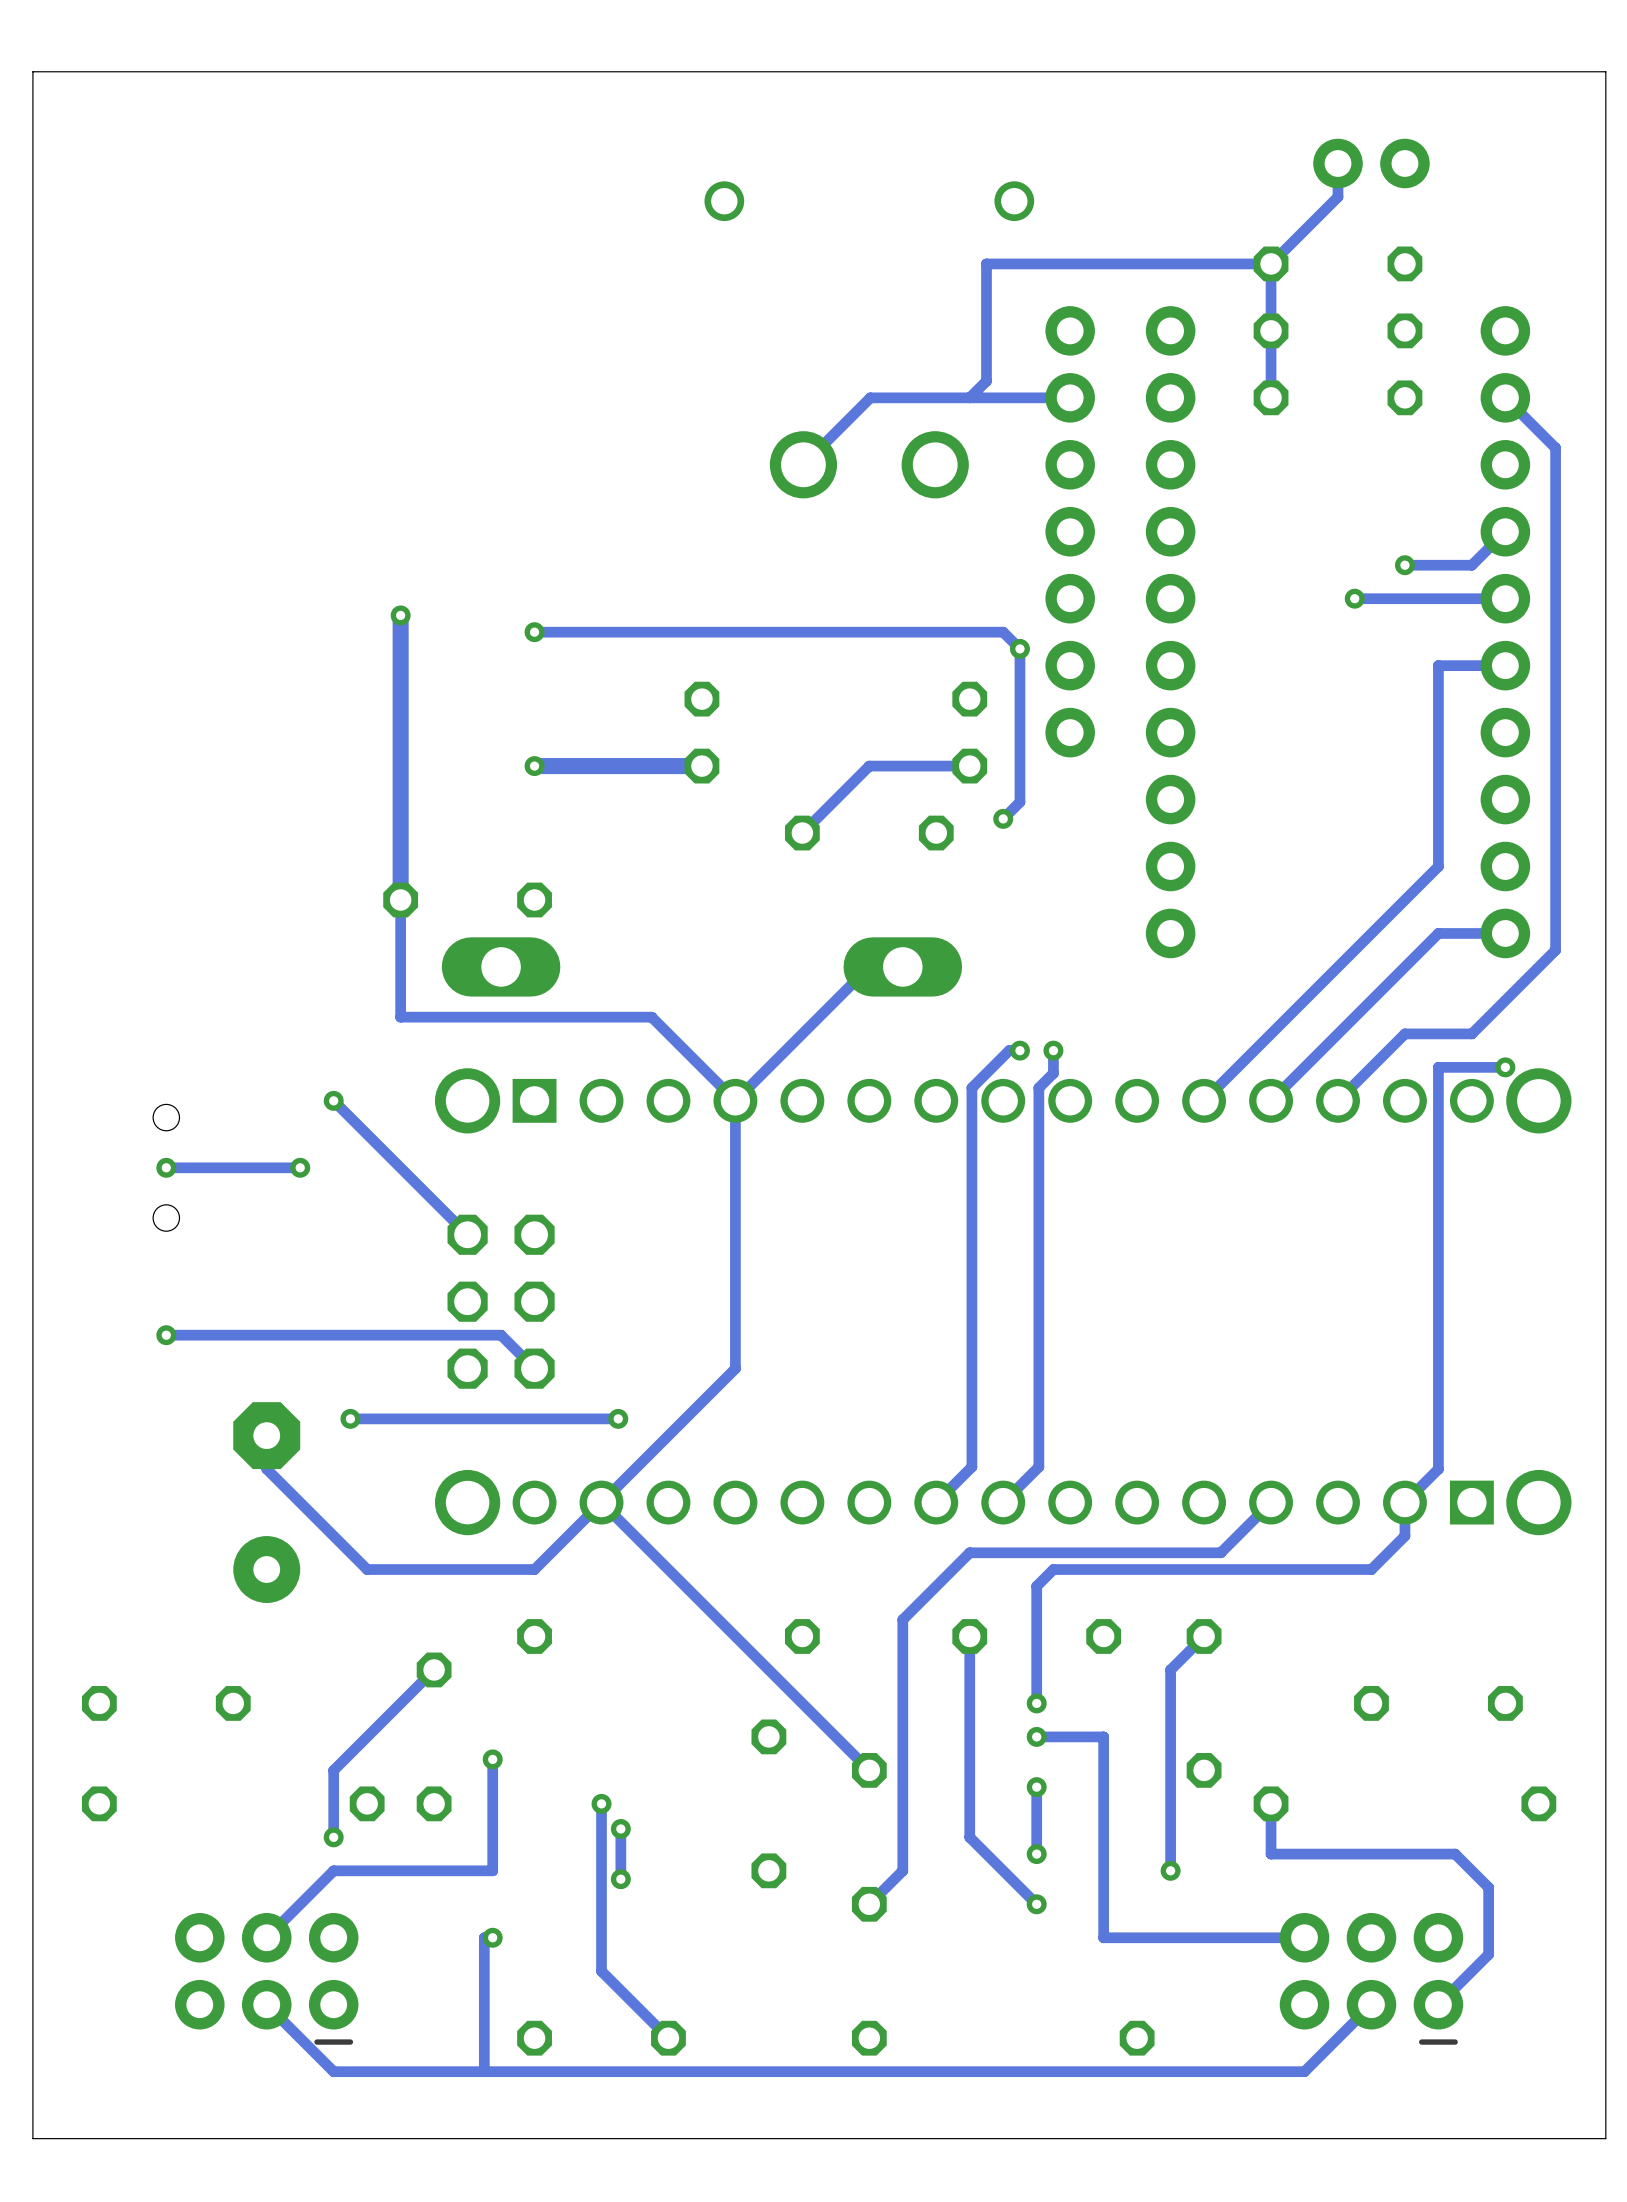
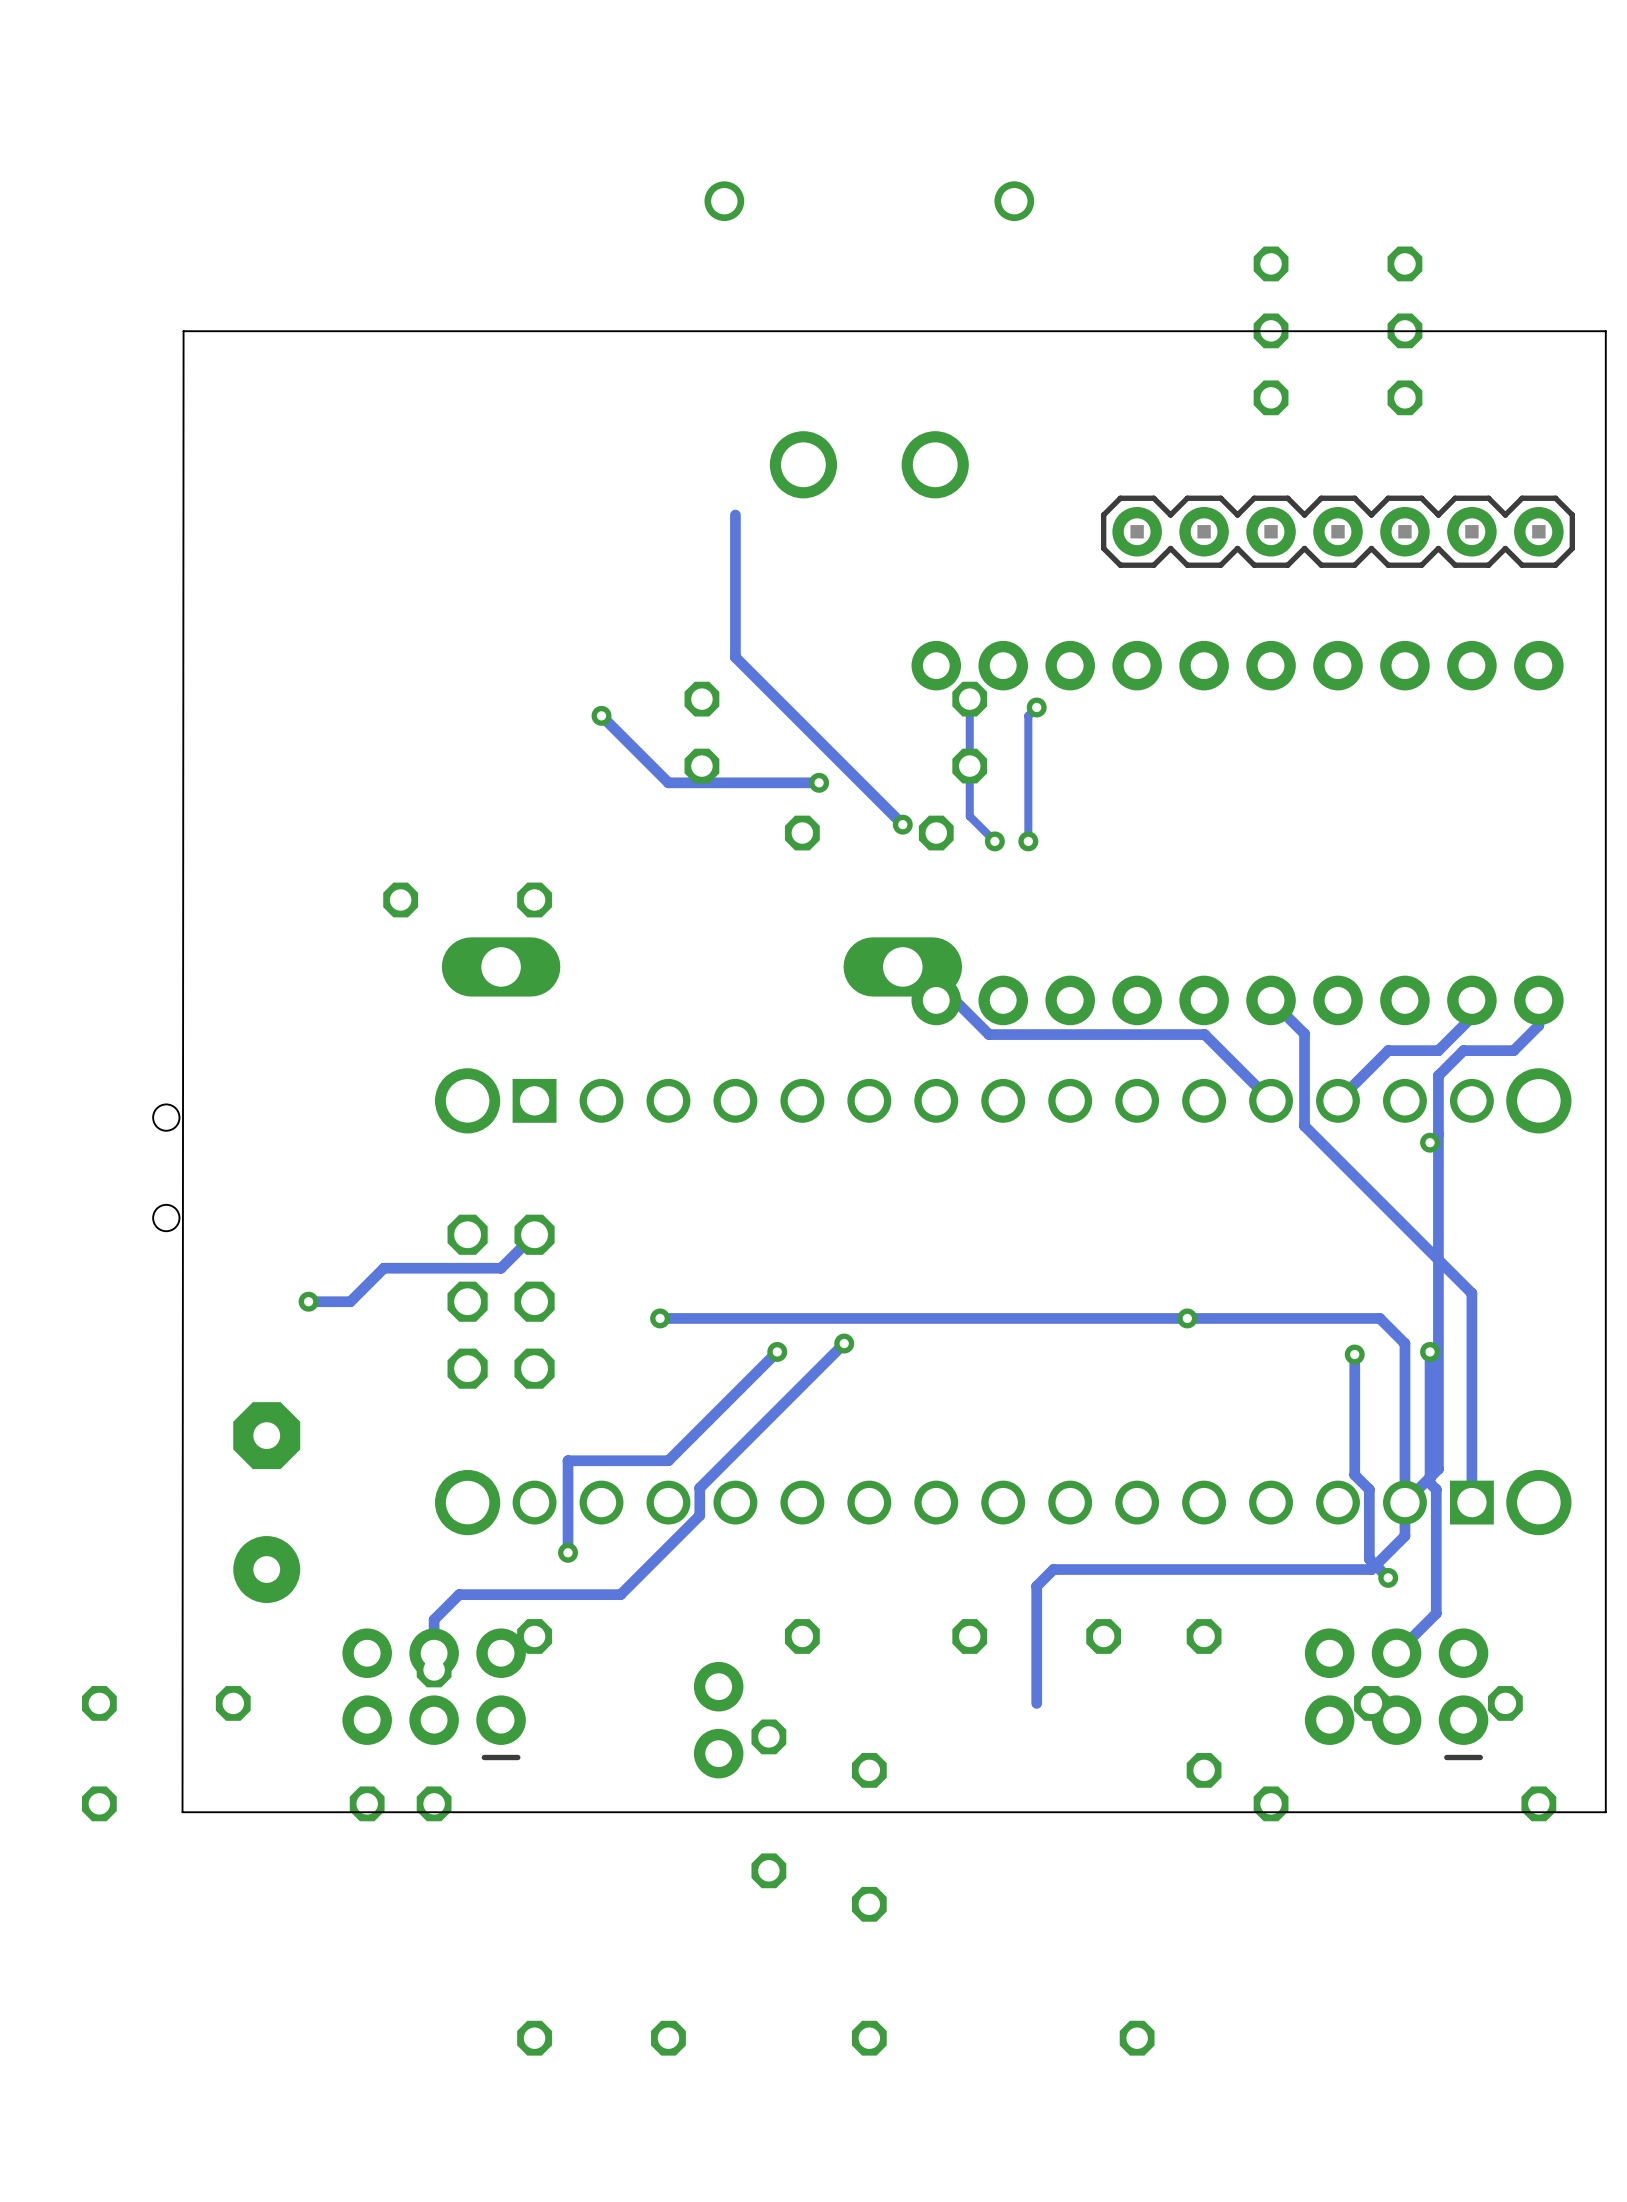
track: (1338, 163) (1338, 196) (1271, 263) -> none
part: (1371, 163) -> none
track: (1271, 263) (1271, 397) -> none
track: (1271, 263) (986, 263) (986, 381) (969, 397) -> none
board edge: (1605, 331) (1605, 71) (32, 71) (32, 2138) (1605, 2138) (1605, 1812) -> (1605, 331) (183, 331) (182, 1812) (1605, 1812)
track: (1070, 397) (870, 397) (803, 464) -> none
track: (1505, 397) (1555, 448) (1555, 950) (1471, 1033) (1404, 1033) (1388, 1050) -> (1471, 1000) (1471, 1017) (1438, 1050) (1388, 1050)
track: none -> (735, 515) (735, 657) (902, 824)
part side: top (1070, 531) -> bottom (1338, 531)
track: (1505, 531) (1471, 565) (1404, 565) -> none
via: (1404, 565) -> none
via: (1354, 598) -> none
track: (1505, 598) (1354, 598) -> none
track: (400, 615) (400, 1017) (651, 1017) (735, 1100) -> none
via: (400, 615) -> none
track: (534, 632) (1003, 632) (1019, 648) (1019, 802) (1003, 818) -> none
via: (534, 632) -> none
part rotation: 0° (1170, 632) -> 90° clockwise (1237, 665)
part: (1505, 632) -> none
via: (1019, 648) -> none
track: (1505, 665) (1438, 665) (1438, 866) (1204, 1100) -> none
track: none -> (969, 707) (969, 816) (994, 841)
track: none -> (1036, 707) (1028, 715) (1028, 841)
via: none -> (1036, 707)
track: none -> (601, 715) (668, 782) (819, 782)
via: none -> (601, 715)
via: (534, 766) -> none
track: (701, 766) (534, 766) -> none
track: (969, 766) (869, 766) (802, 833) -> none
via: none -> (819, 782)
via: (1003, 818) -> none
via: none -> (902, 824)
via: none -> (994, 841)
via: none -> (1028, 841)
track: (1505, 933) (1438, 933) (1271, 1100) -> (936, 1000) (954, 1000) (989, 1034) (1204, 1034) (1271, 1100)
track: (902, 966) (869, 966) (735, 1100) -> none
part: none -> (1237, 1000)
track: none -> (1271, 1000) (1304, 1033) (1304, 1125) (1471, 1293) (1471, 1502)
track: (1019, 1050) (1009, 1050) (971, 1087) (971, 1466) (936, 1502) -> none
via: (1019, 1050) -> none
track: (1053, 1050) (1053, 1073) (1038, 1087) (1038, 1466) (1003, 1502) -> none
via: (1053, 1050) -> none
track: (1505, 1067) (1438, 1067) (1438, 1075) -> (1538, 1000) (1538, 1025) (1513, 1050) (1463, 1050) (1438, 1075)
via position: (1505, 1067) -> (1430, 1142)
track: (333, 1100) (467, 1234) -> none
via: (333, 1100) -> none
track: (735, 1100) (735, 1368) (534, 1569) (367, 1569) (266, 1469) (266, 1435) -> none
via: (166, 1167) -> none
track: (300, 1167) (166, 1167) -> none
via: (300, 1167) -> none
track: none -> (534, 1234) (501, 1268) (383, 1268) (350, 1301) (308, 1301)
via: none -> (308, 1301)
track: none -> (660, 1318) (1379, 1318) (1404, 1343) (1404, 1502)
via: none -> (660, 1318)
via: none -> (1187, 1318)
track: (166, 1335) (501, 1335) (534, 1368) -> none
via: (166, 1335) -> none
track: none -> (844, 1343) (699, 1487) (699, 1515) (620, 1594) (459, 1594) (434, 1619) (434, 1653)
via: none -> (844, 1343)
track: none -> (777, 1351) (668, 1460) (568, 1460) (568, 1552)
via: none -> (777, 1351)
track: none -> (1430, 1351) (1430, 1483) (1436, 1489) (1436, 1613) (1396, 1653)
via: none -> (1430, 1351)
track: none -> (1354, 1354) (1354, 1475) (1369, 1489) (1369, 1559) (1388, 1577)
via: none -> (1354, 1354)
via: (350, 1418) -> none
track: (618, 1418) (350, 1418) -> none
via: (618, 1418) -> none
track: (601, 1502) (869, 1770) -> none
track: (1271, 1502) (1220, 1552) (969, 1552) (902, 1619) (902, 1870) (869, 1904) -> none
via: none -> (568, 1552)
via: none -> (1388, 1577)
track: (969, 1636) (969, 1837) (1036, 1904) -> none
track: (1204, 1636) (1170, 1669) (1170, 1870) -> none
track: (434, 1669) (333, 1770) (333, 1837) -> none
via: (1036, 1703) -> none
part: none -> (718, 1720)
track: (1036, 1736) (1103, 1736) (1103, 1937) (1304, 1937) -> none
via: (1036, 1736) -> none
track: (492, 1759) (492, 1870) (333, 1870) (266, 1937) -> none
via: (492, 1759) -> none
track: (1036, 1787) (1036, 1854) -> none
via: (1036, 1787) -> none
track: (601, 1803) (601, 1971) (668, 2038) -> none
via: (601, 1803) -> none
track: (1271, 1803) (1271, 1854) (1455, 1854) (1488, 1887) (1488, 1954) (1438, 2004) -> none
track: (620, 1828) (620, 1879) -> none
via: (620, 1828) -> none
via: (333, 1837) -> none
via: (1036, 1854) -> none
via: (1170, 1870) -> none
via: (620, 1879) -> none
via: (1036, 1904) -> none
track: (492, 1937) (484, 1937) (484, 2071) -> none
via: (492, 1937) -> none
part position: (266, 1978) -> (434, 1694)
part position: (1371, 1978) -> (1396, 1694)
track: (1371, 2004) (1304, 2071) (333, 2071) (266, 2004) -> none

